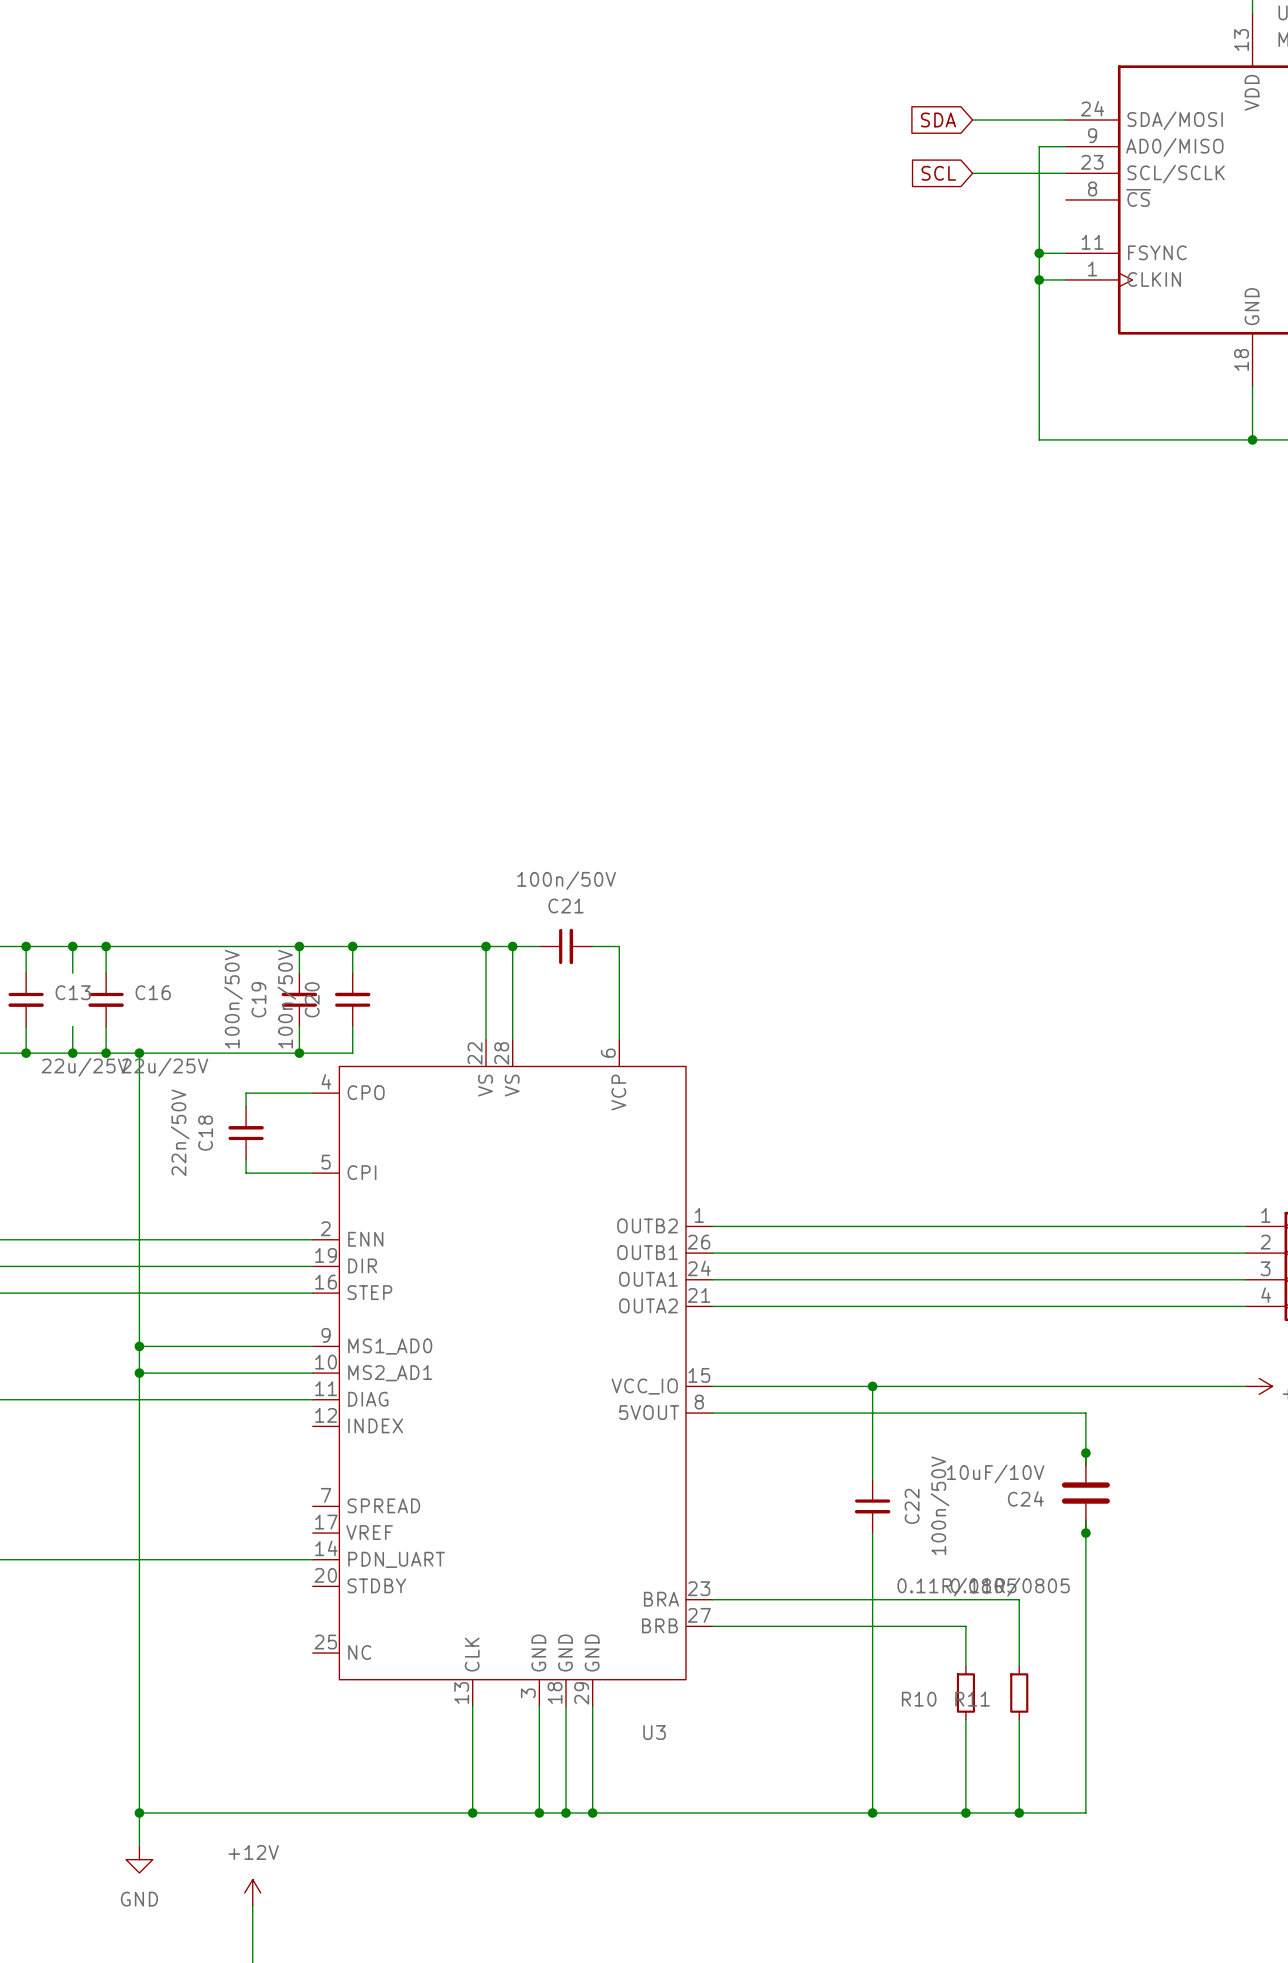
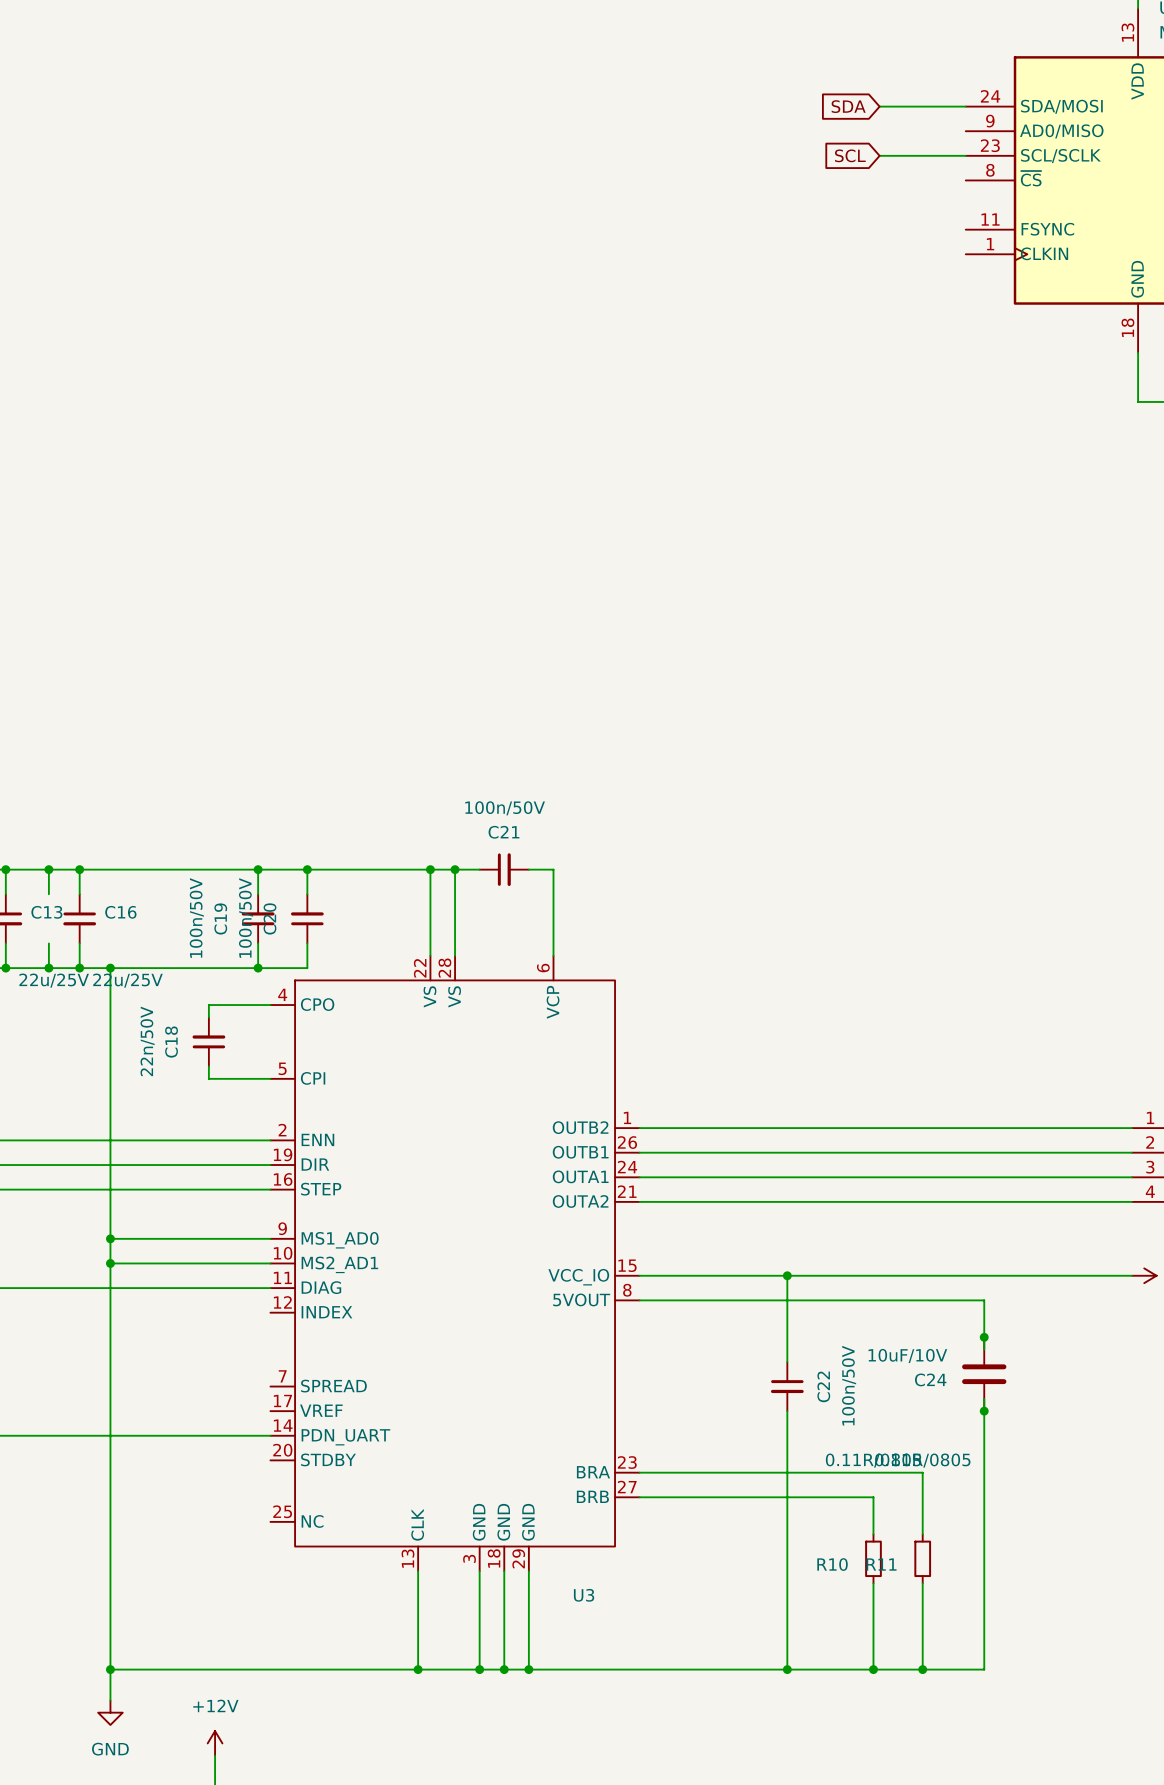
wire: (1065, 146) (1039, 146) (1039, 439) (1252, 439) -> none
wire: (1039, 253) (1065, 253) -> none
junction: (1039, 253) -> none
wire: (1039, 279) (1065, 279) -> none
junction: (1039, 279) -> none
junction: (1252, 439) -> none

